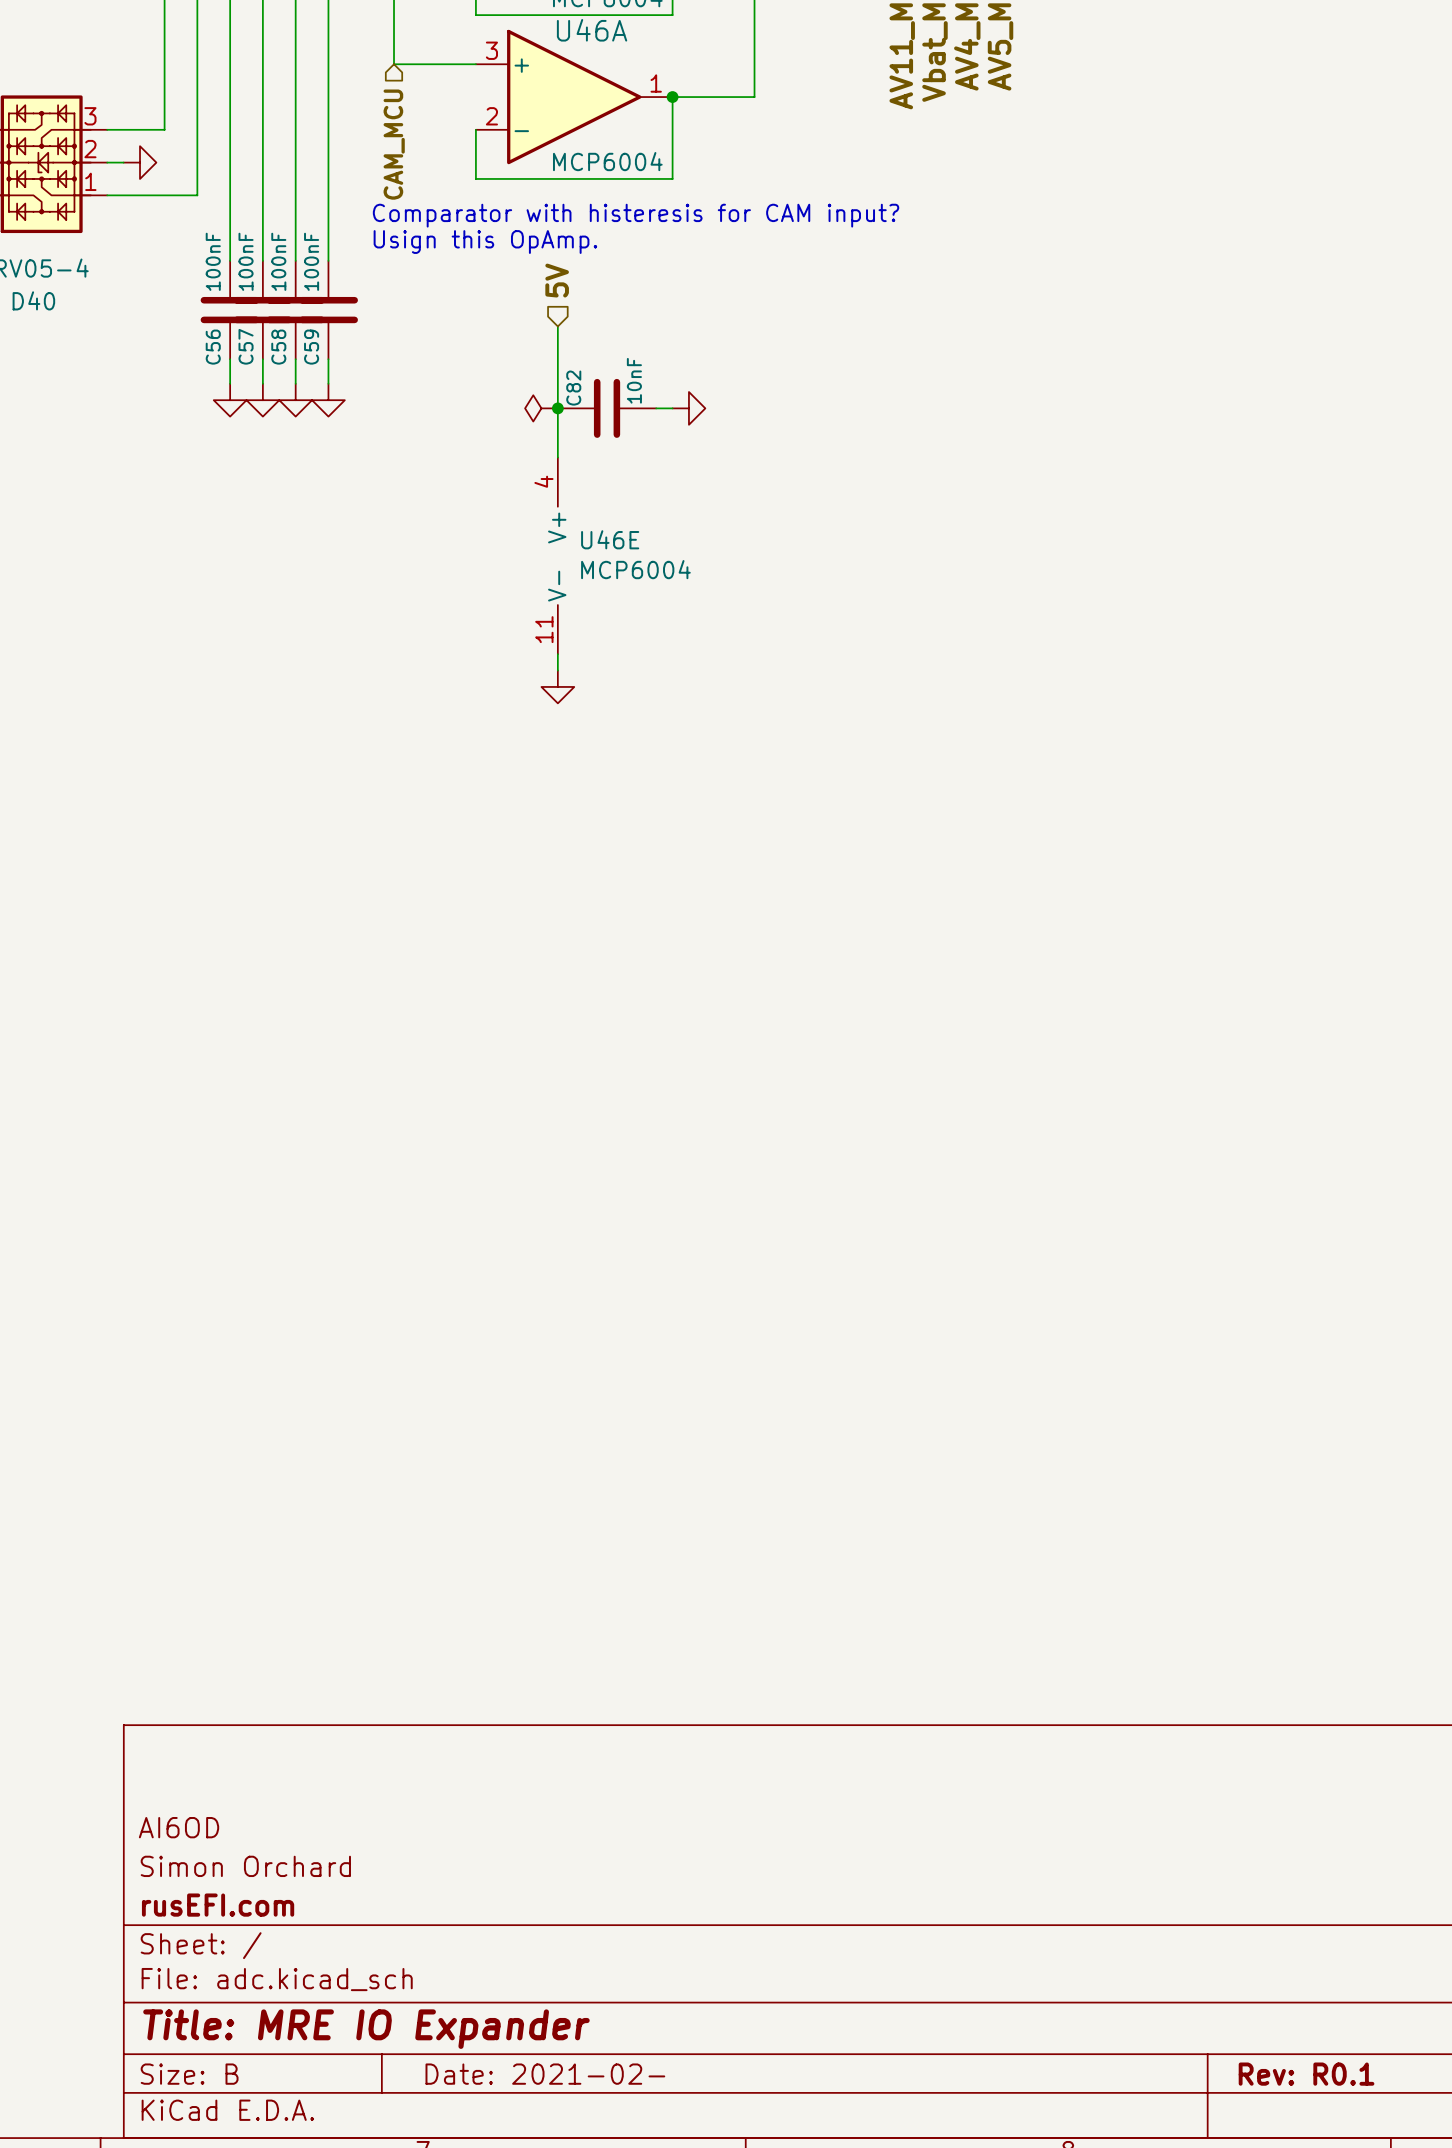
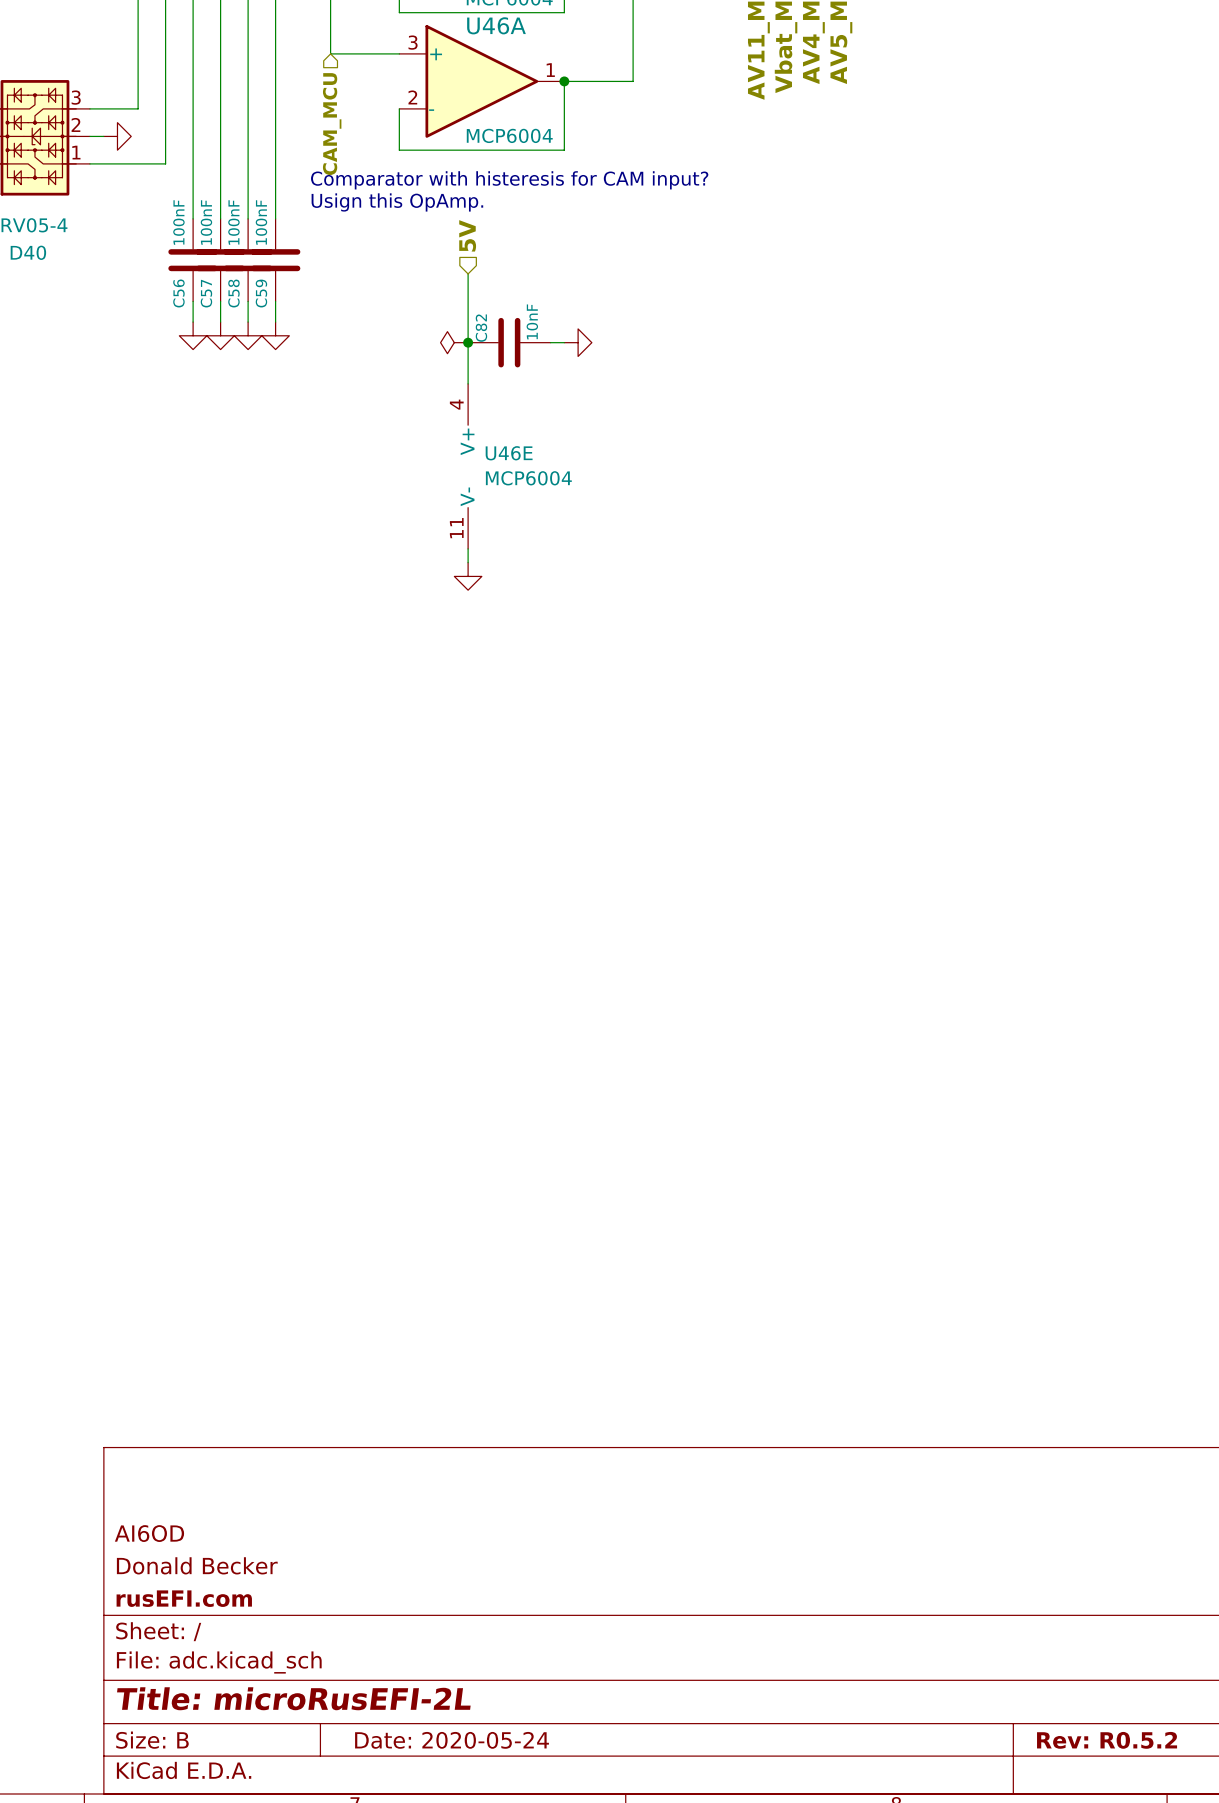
title block: Simon Orchard (245, 1866) -> Donald Becker (197, 1565)
title block: Title: MRE IO Expander (366, 2029) -> Title: microRusEFI-2L (293, 1698)
title block: Date: 2021-02- (545, 2074) -> Date: 2020-05-24 (452, 1740)
title block: Rev: R0.1 (1306, 2074) -> Rev: R0.5.2 (1107, 1740)

